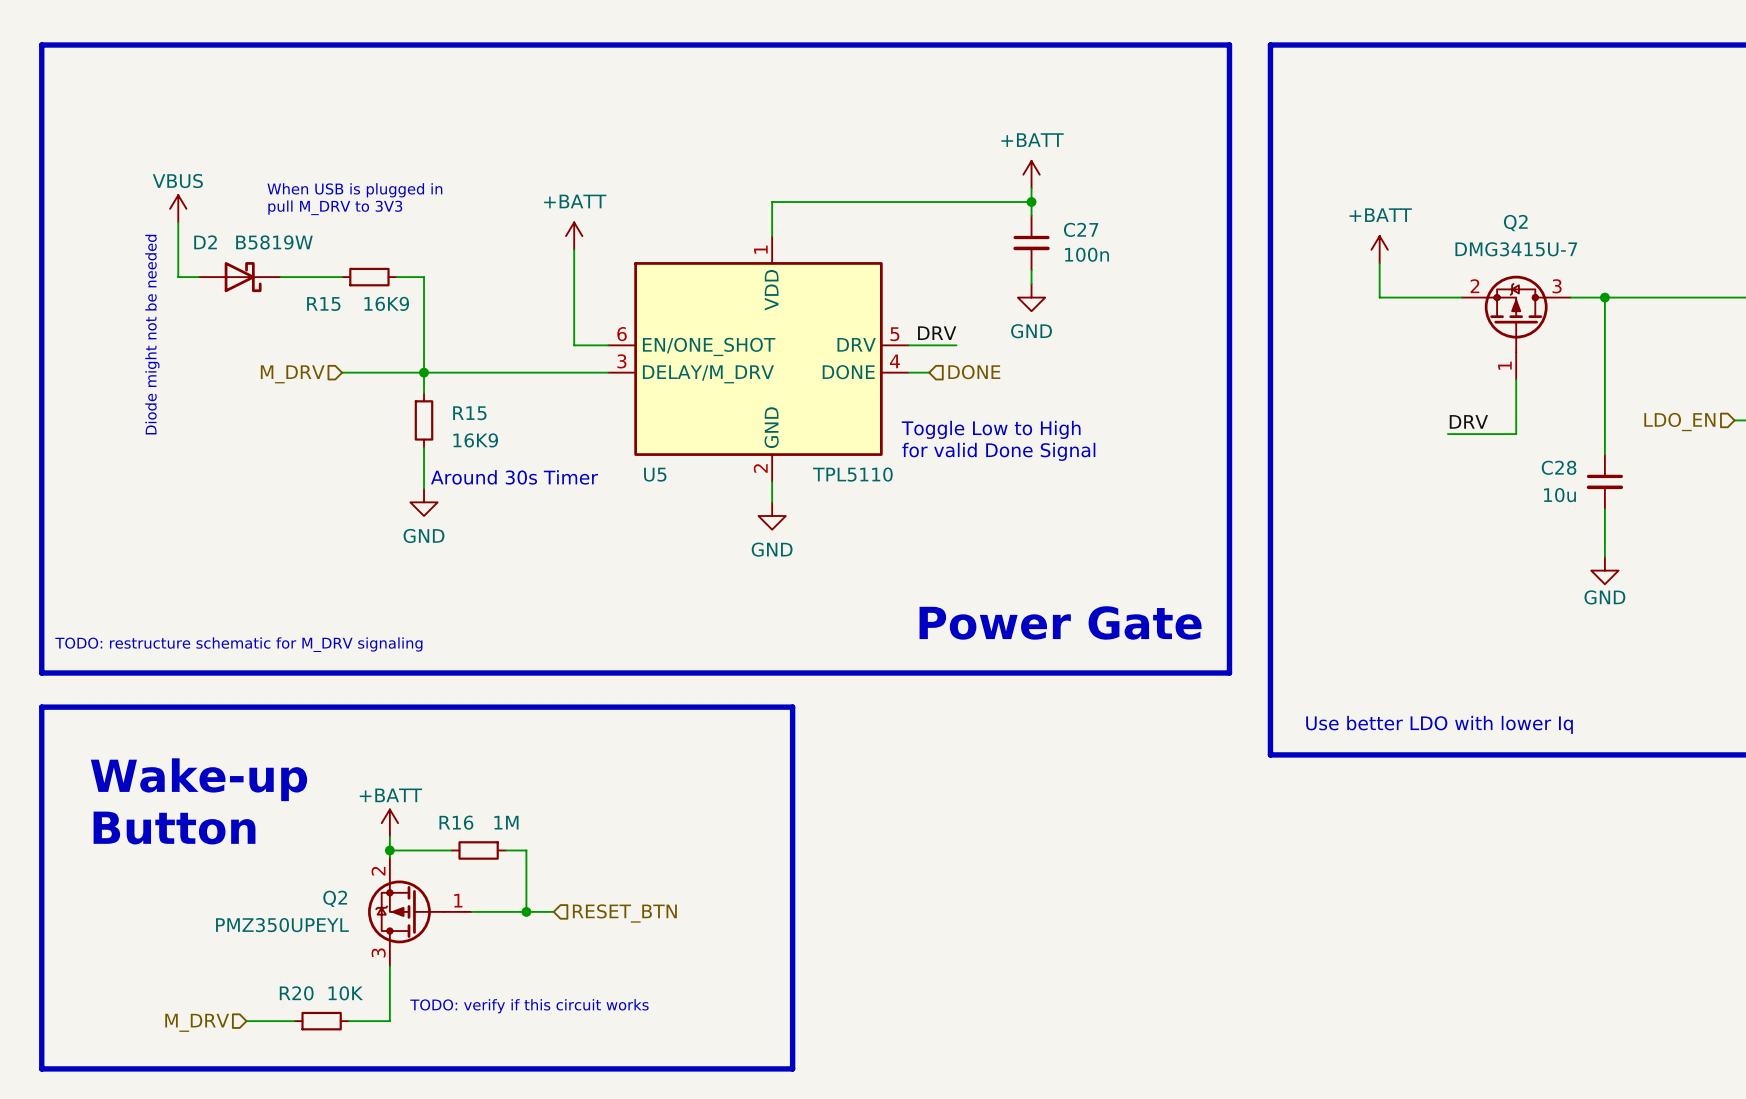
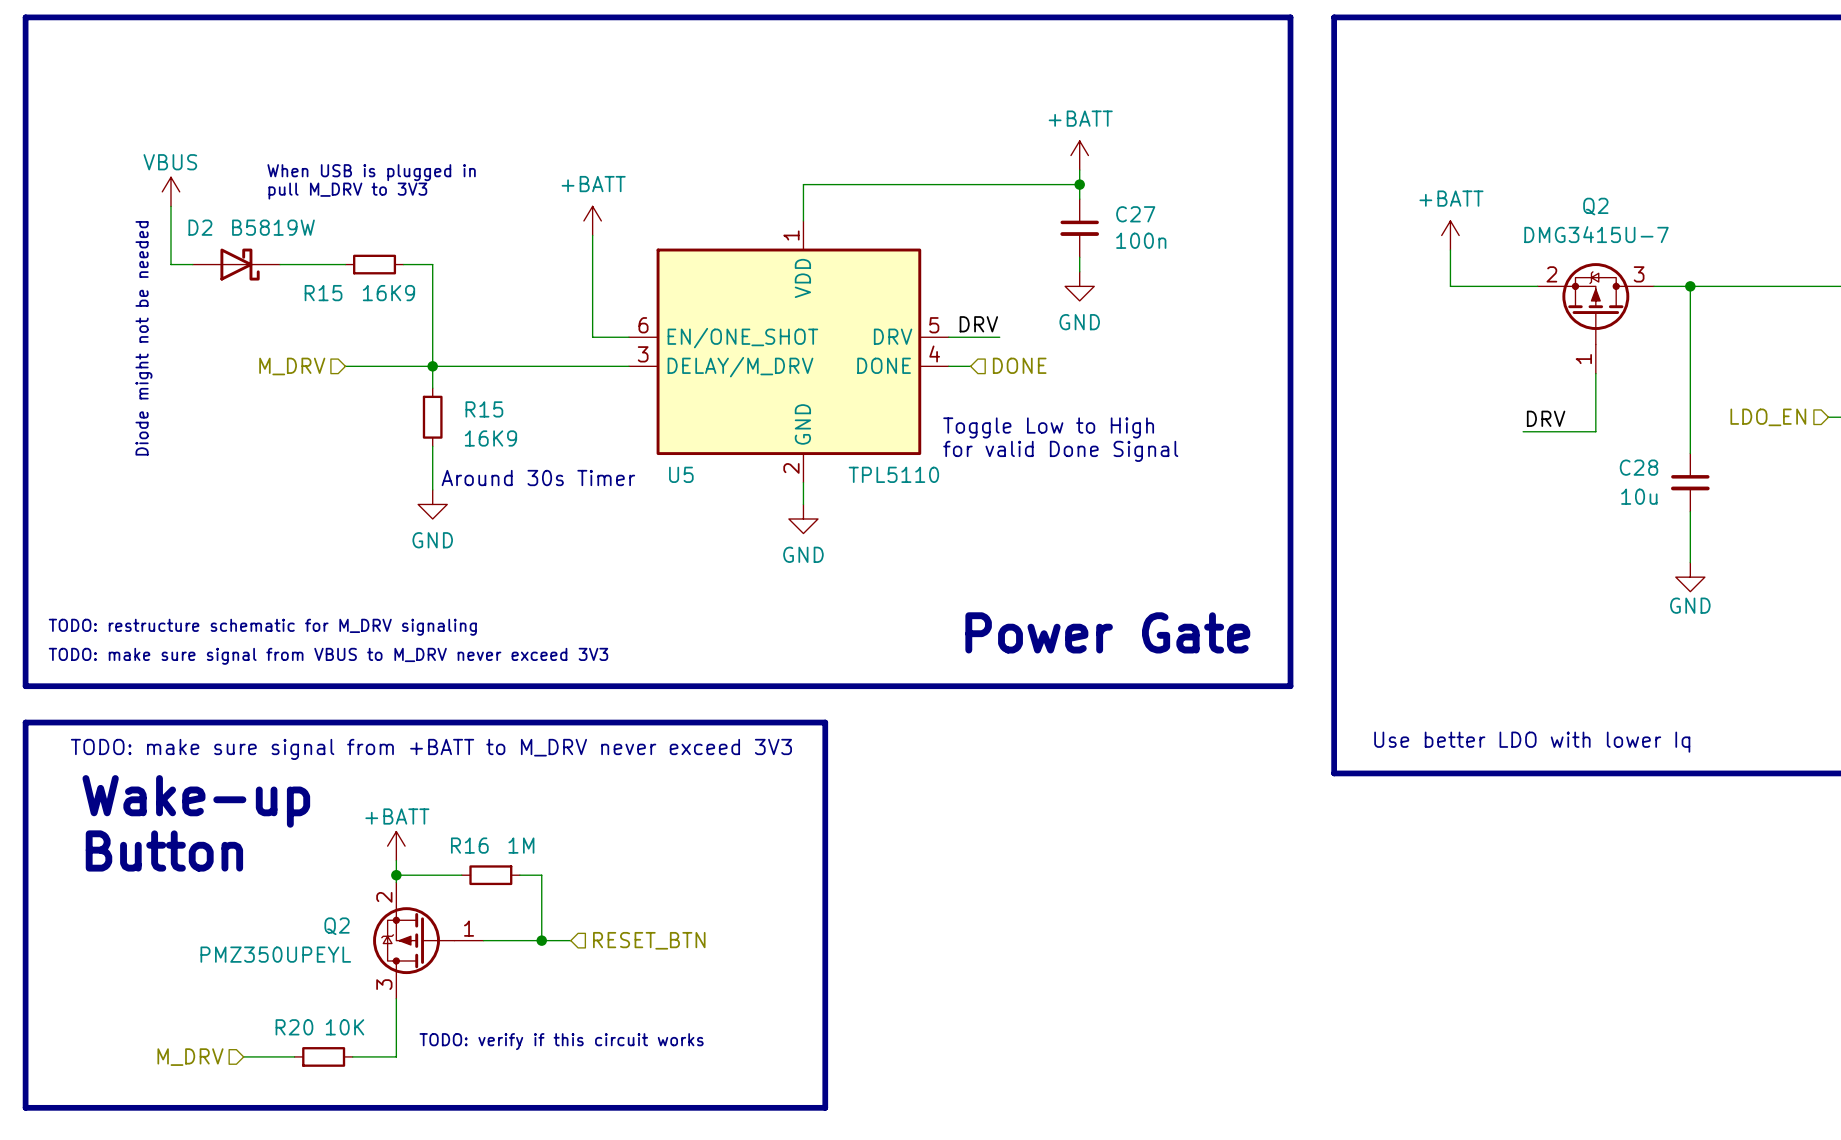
text: none -> TODO: restructure schematic for M_DRV signaling (262, 627)
text: TODO: restructure schematic for M_DRV signaling (238, 644) -> TODO: make sure signal from VBUS to M_DRV never exceed 3V3 (328, 656)
text: none -> TODO: make sure signal from +BATT to M_DRV never exceed 3V3 (431, 749)

